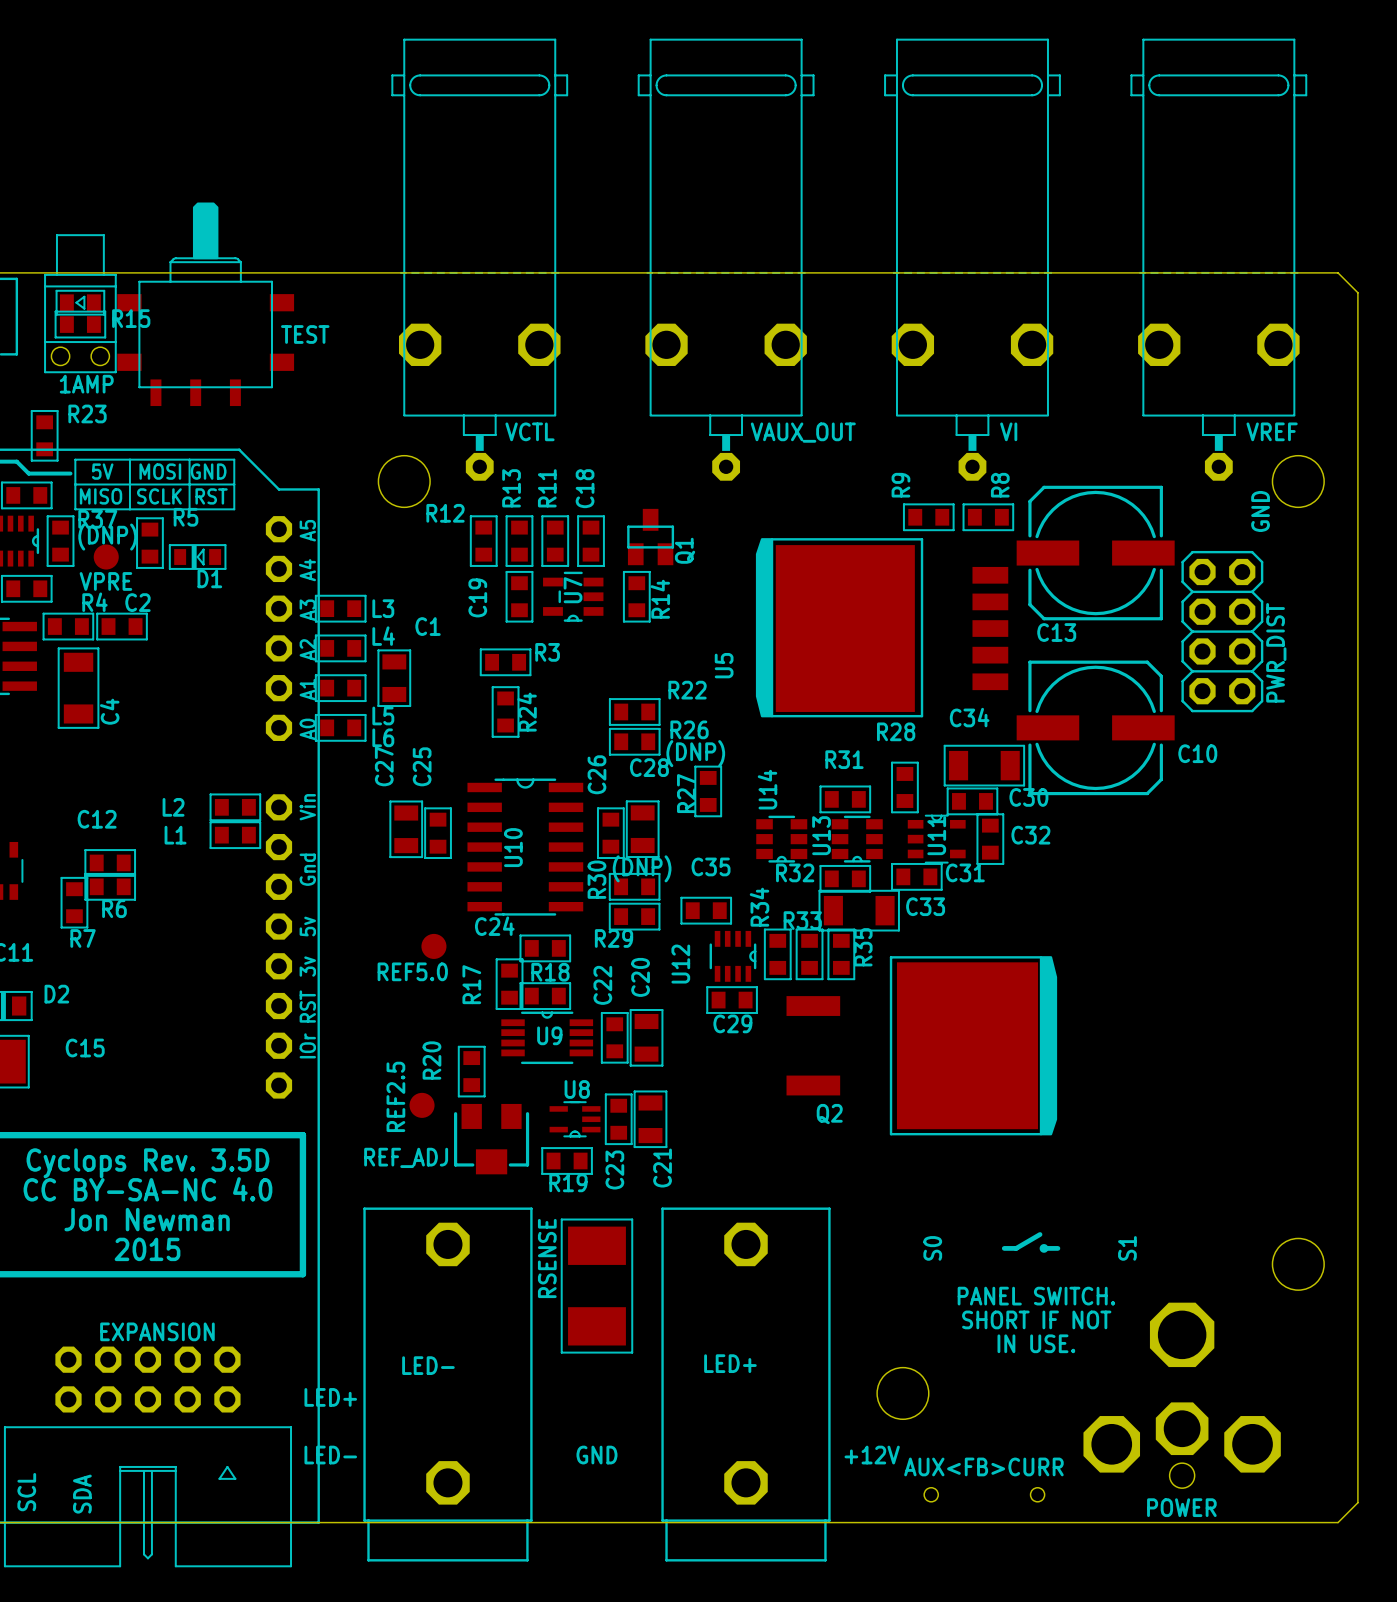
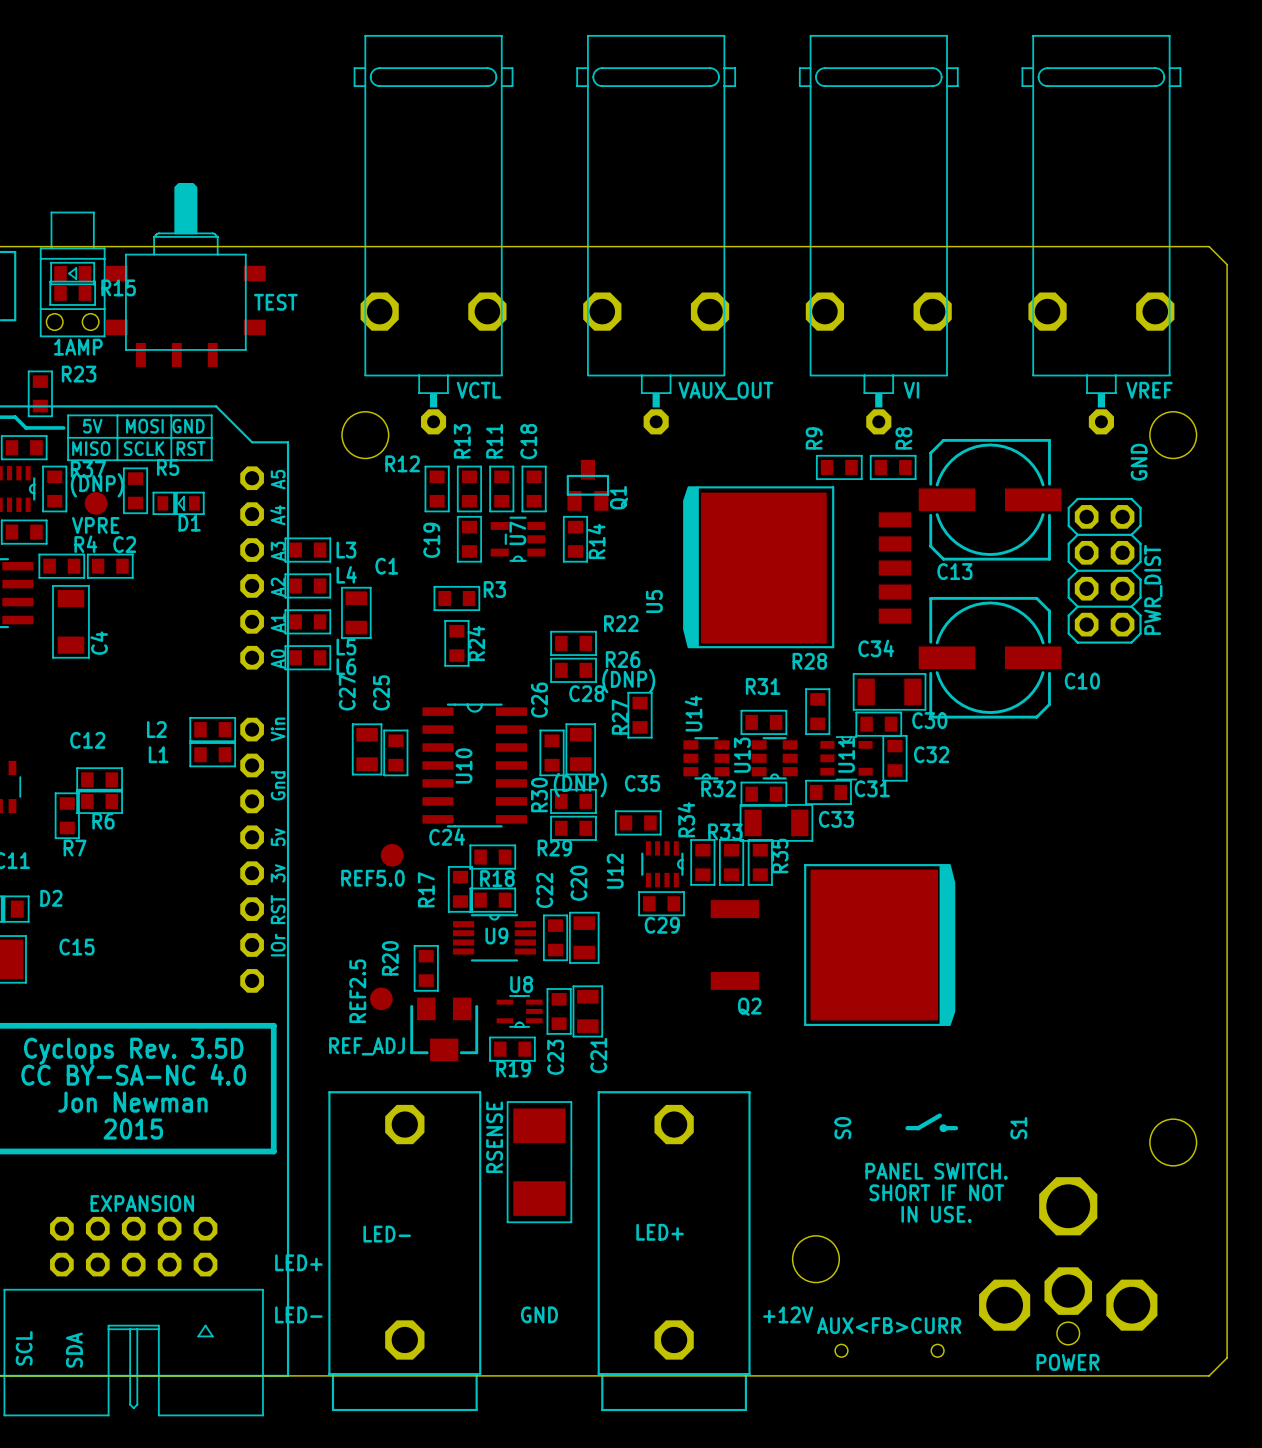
VCTL footprint: [391, 38, 569, 481] -> [353, 34, 514, 435]
VAUX_OUT footprint: [637, 38, 815, 481] -> [576, 34, 737, 435]
VI footprint: [884, 38, 1061, 481] -> [798, 34, 959, 435]
VREF footprint: [1130, 38, 1308, 481] -> [1021, 34, 1182, 435]

